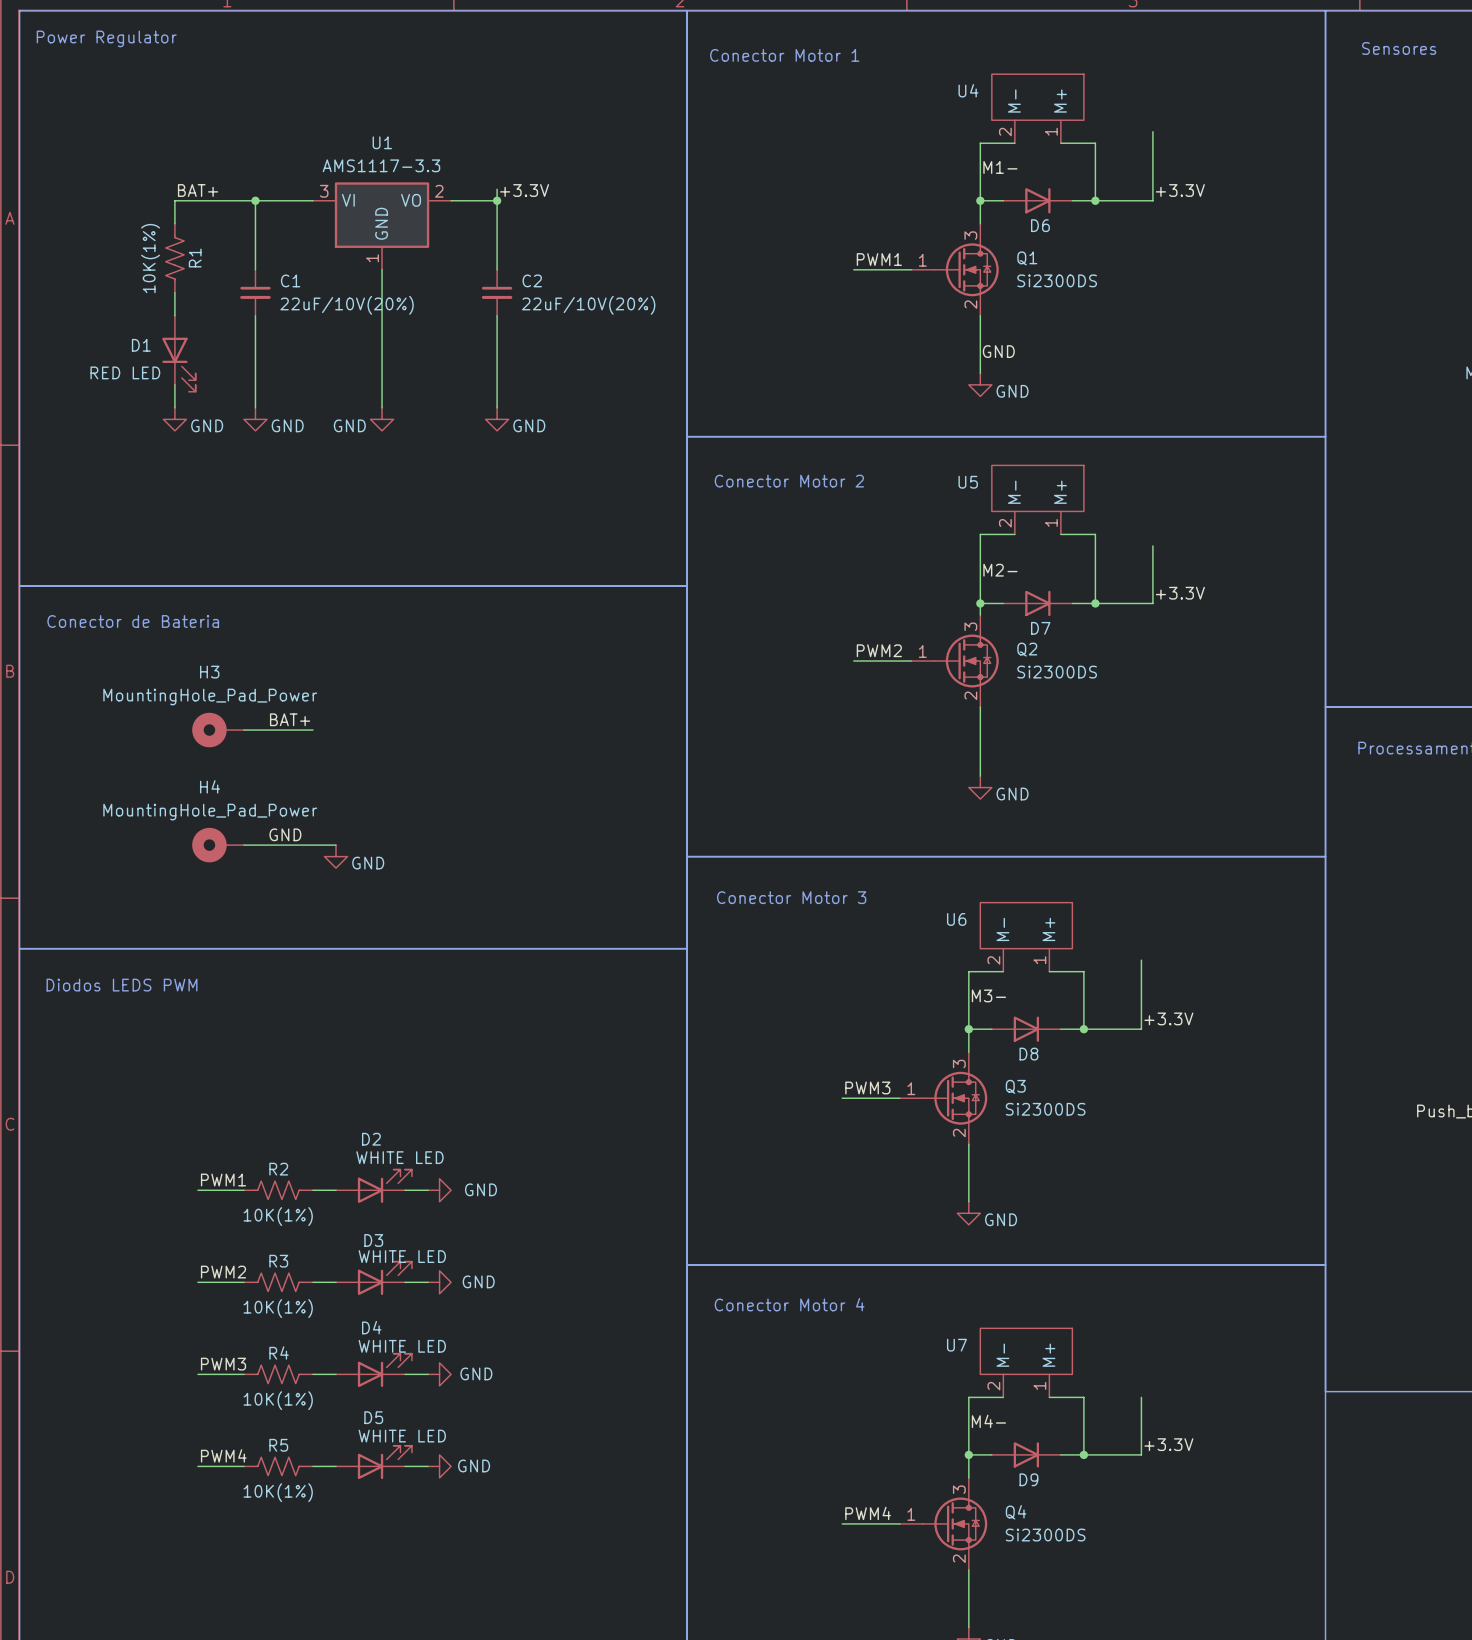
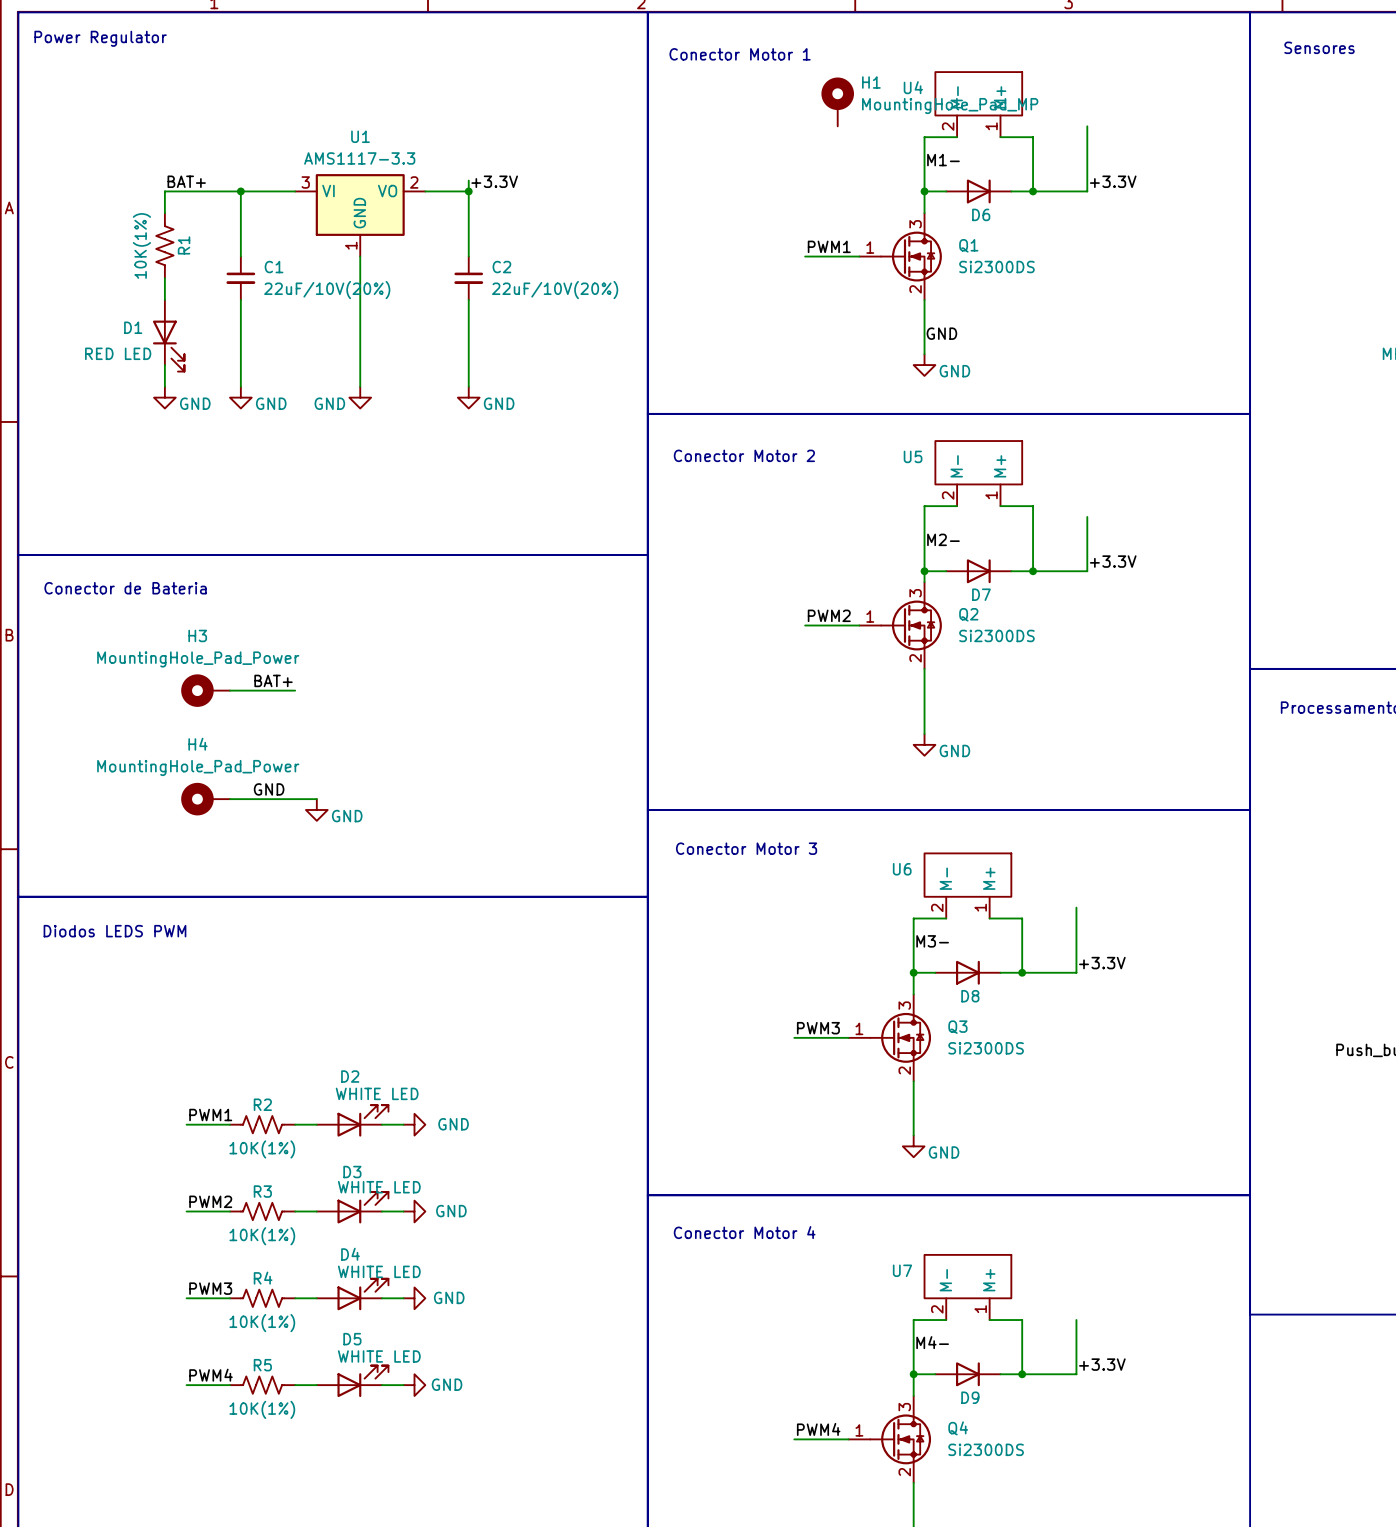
H1: none -> MountingHole_Pad_MP (837, 101)

